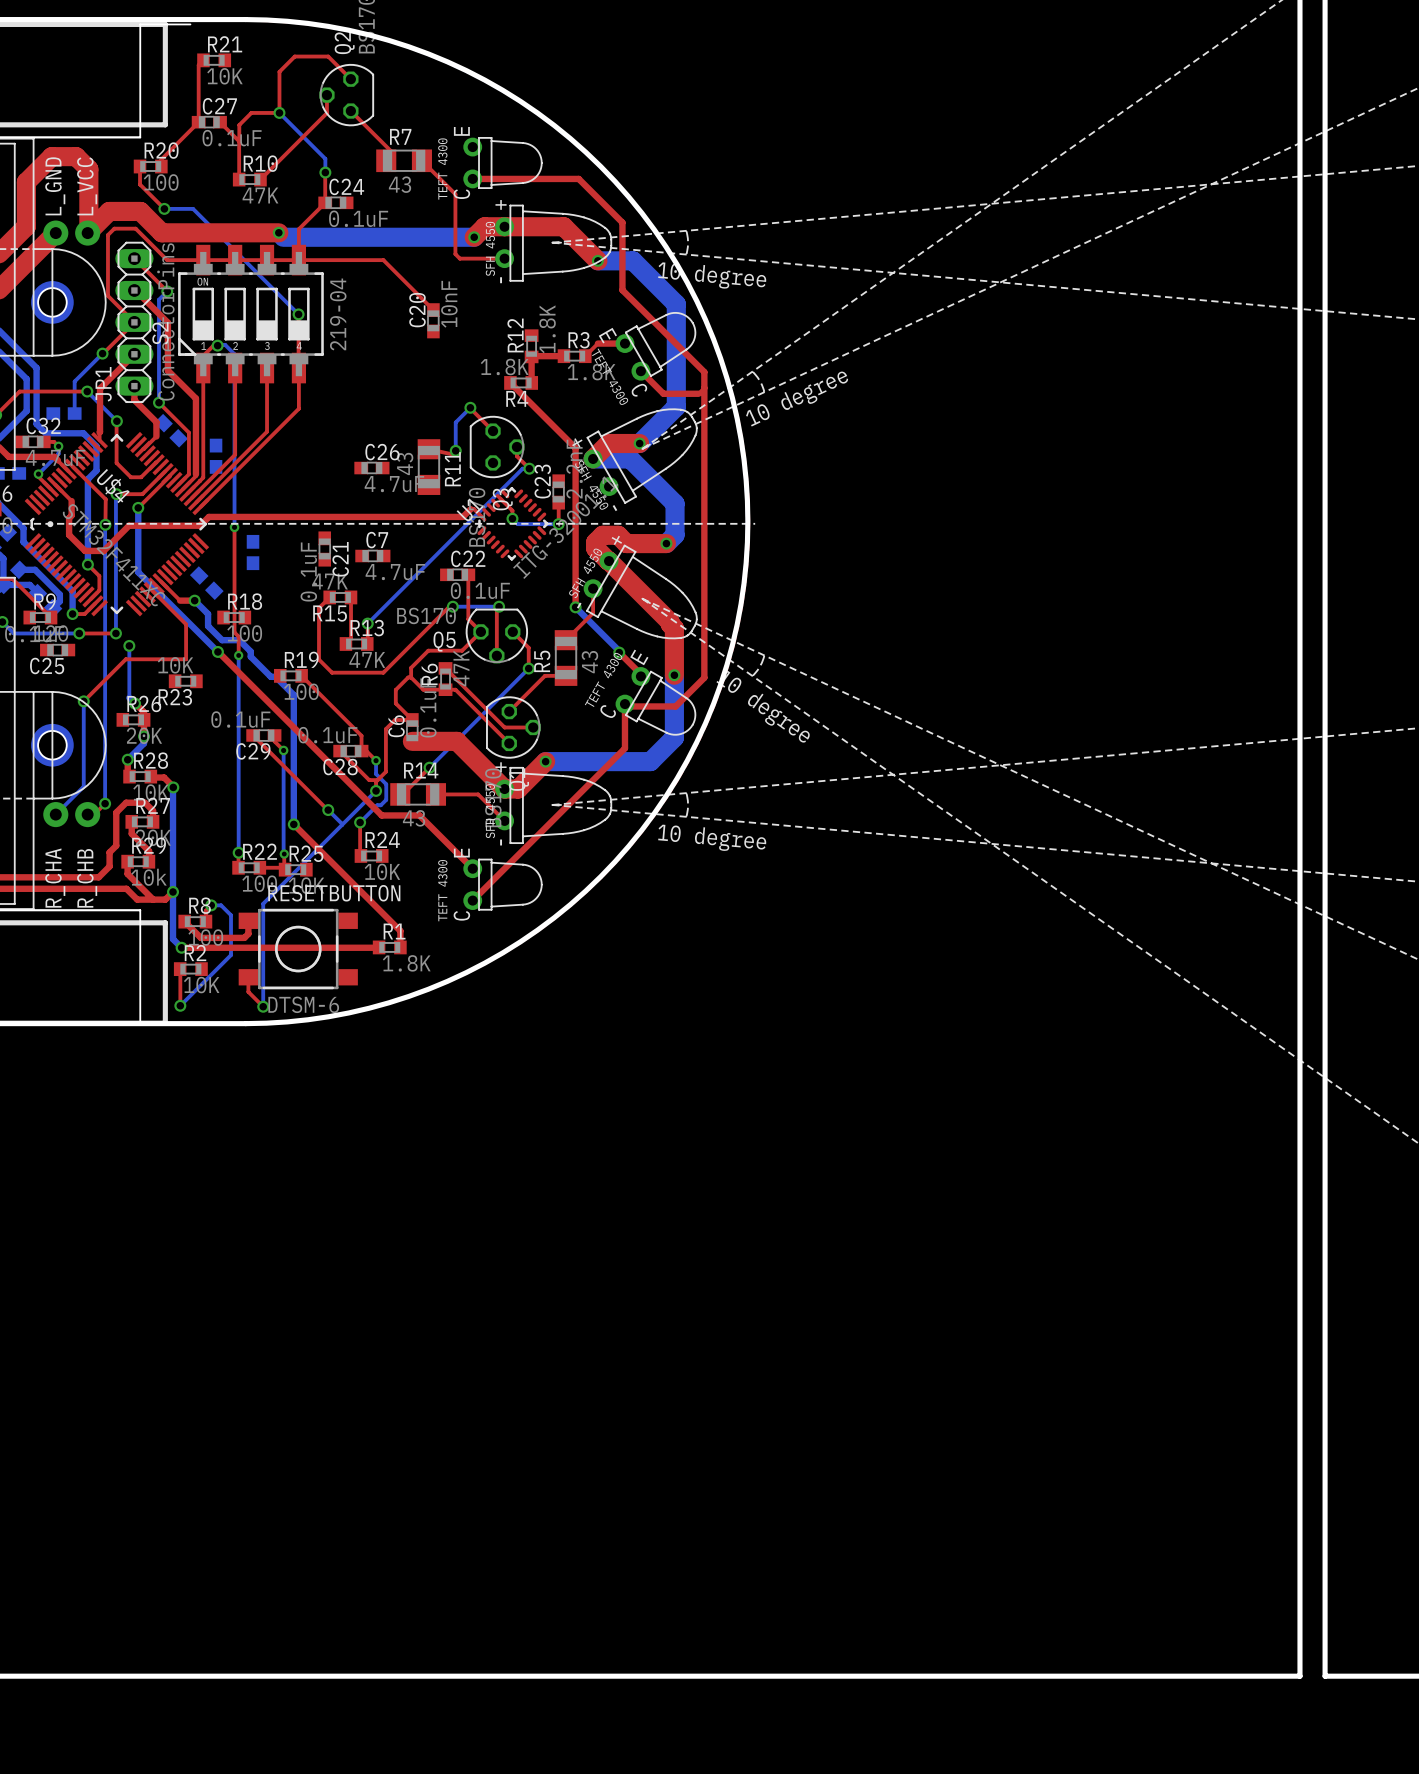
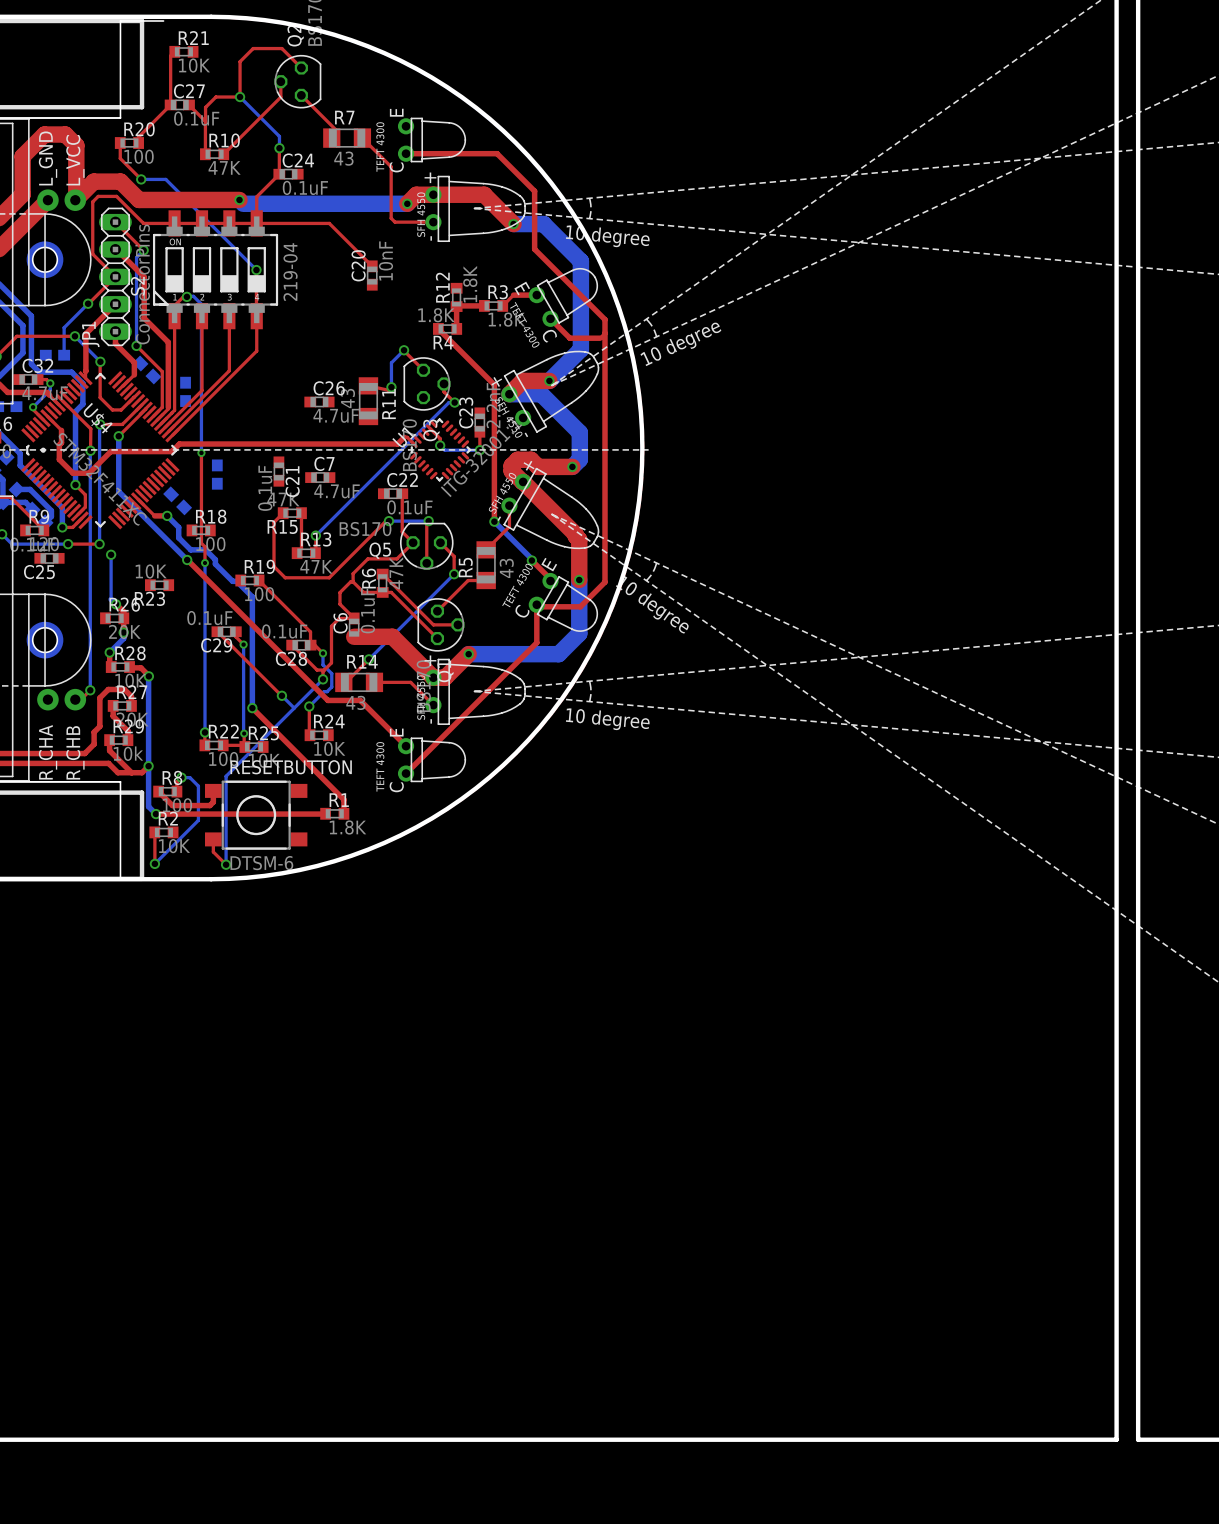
top track: (151, 590) (186, 624) (186, 659) (125, 659) (83, 701) -> none
bottom track: (83, 701) (83, 786) (55, 814) -> none
via: (83, 701) -> none

